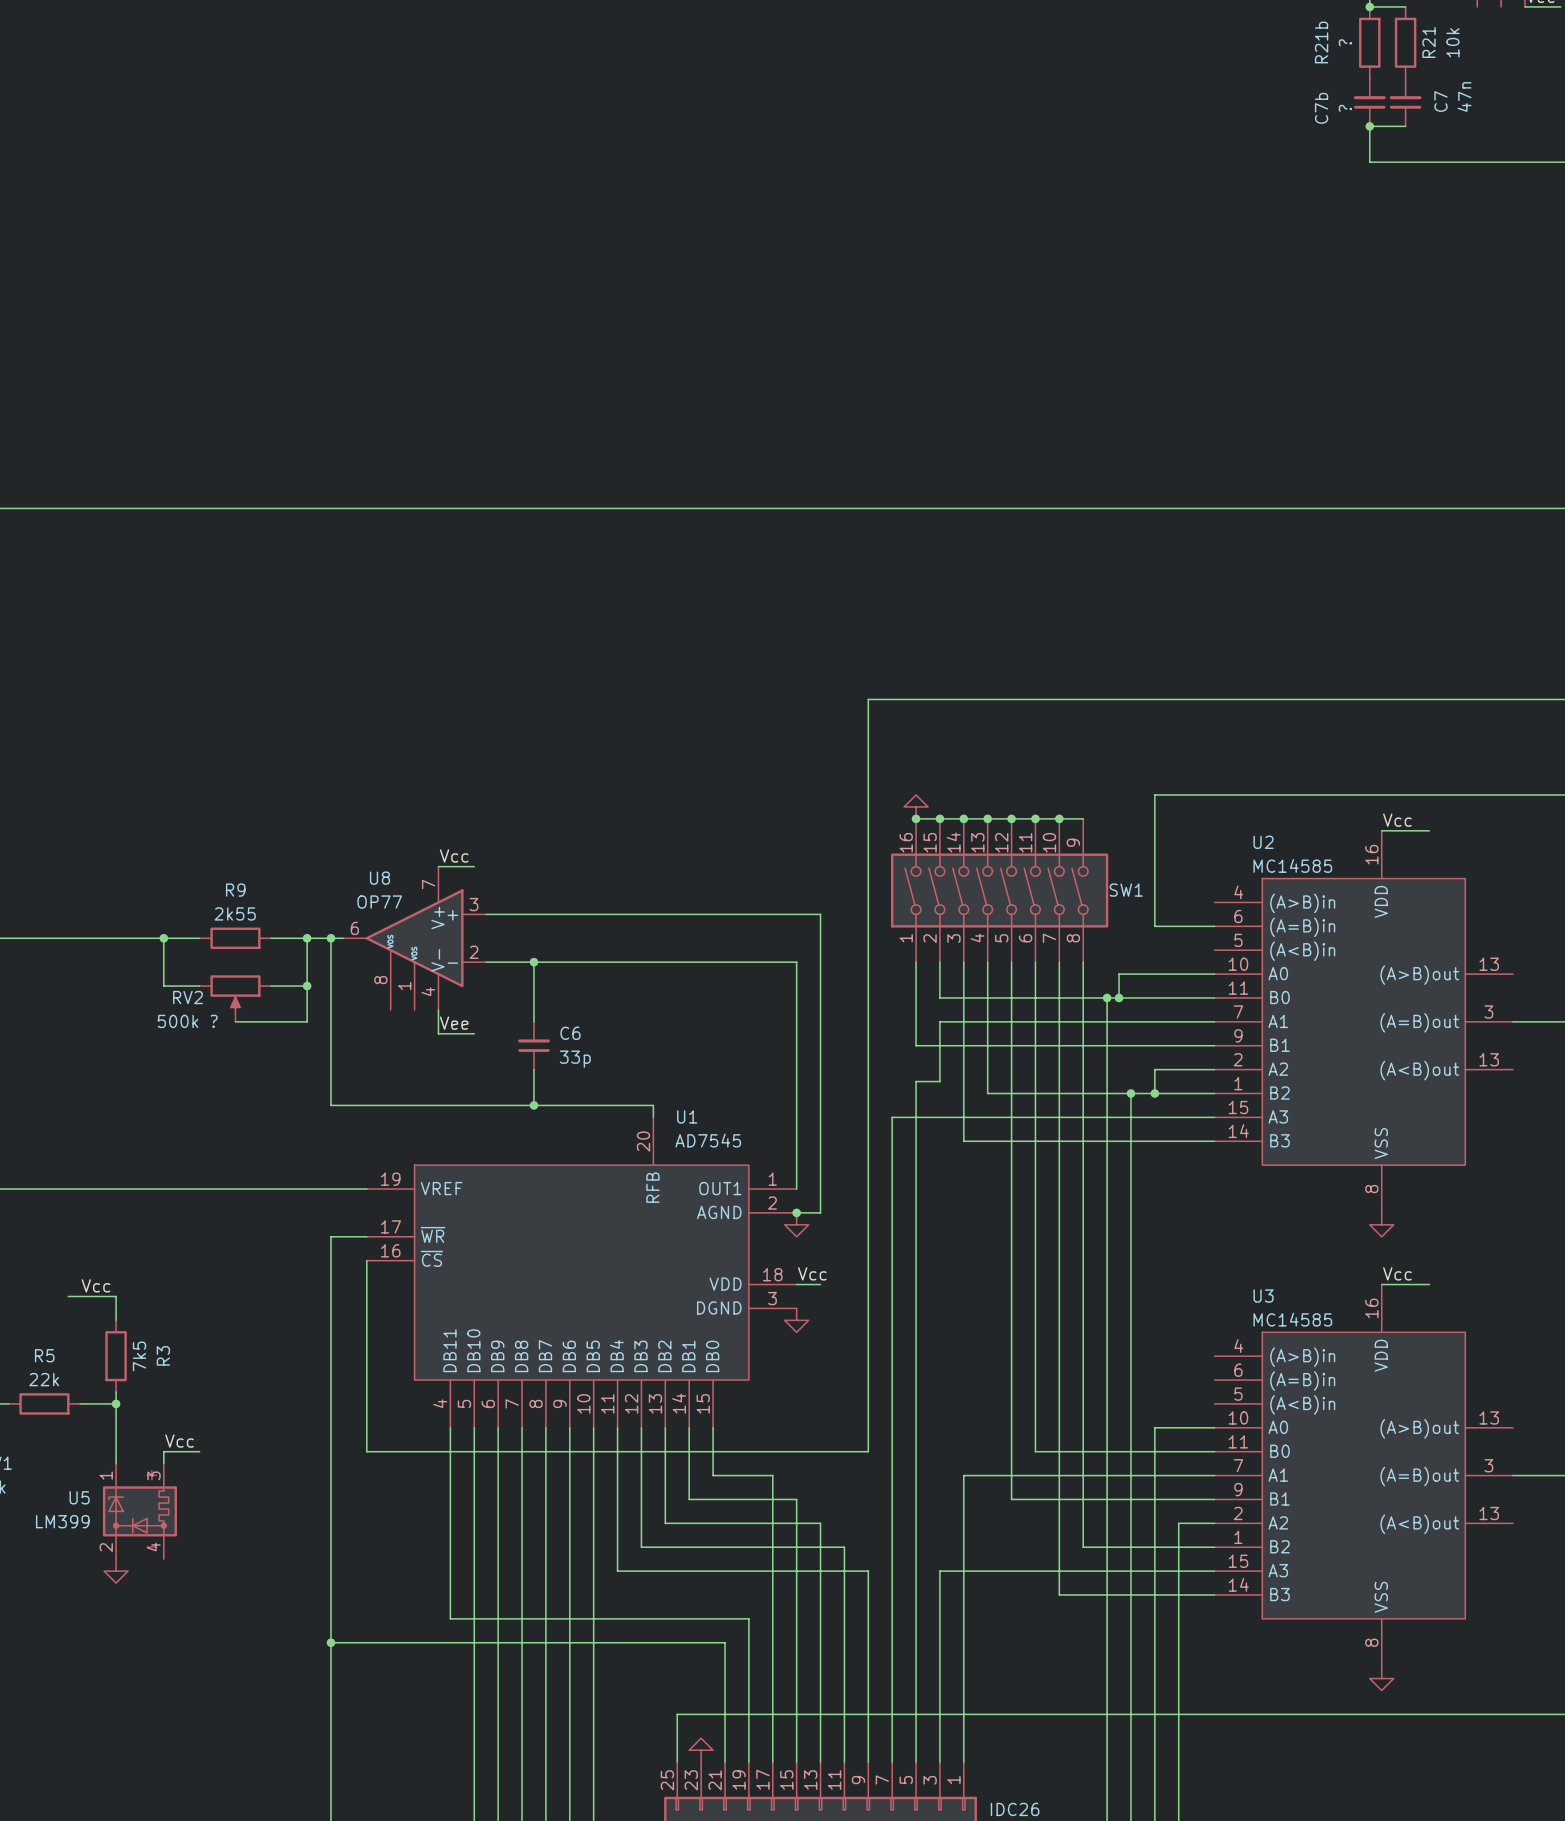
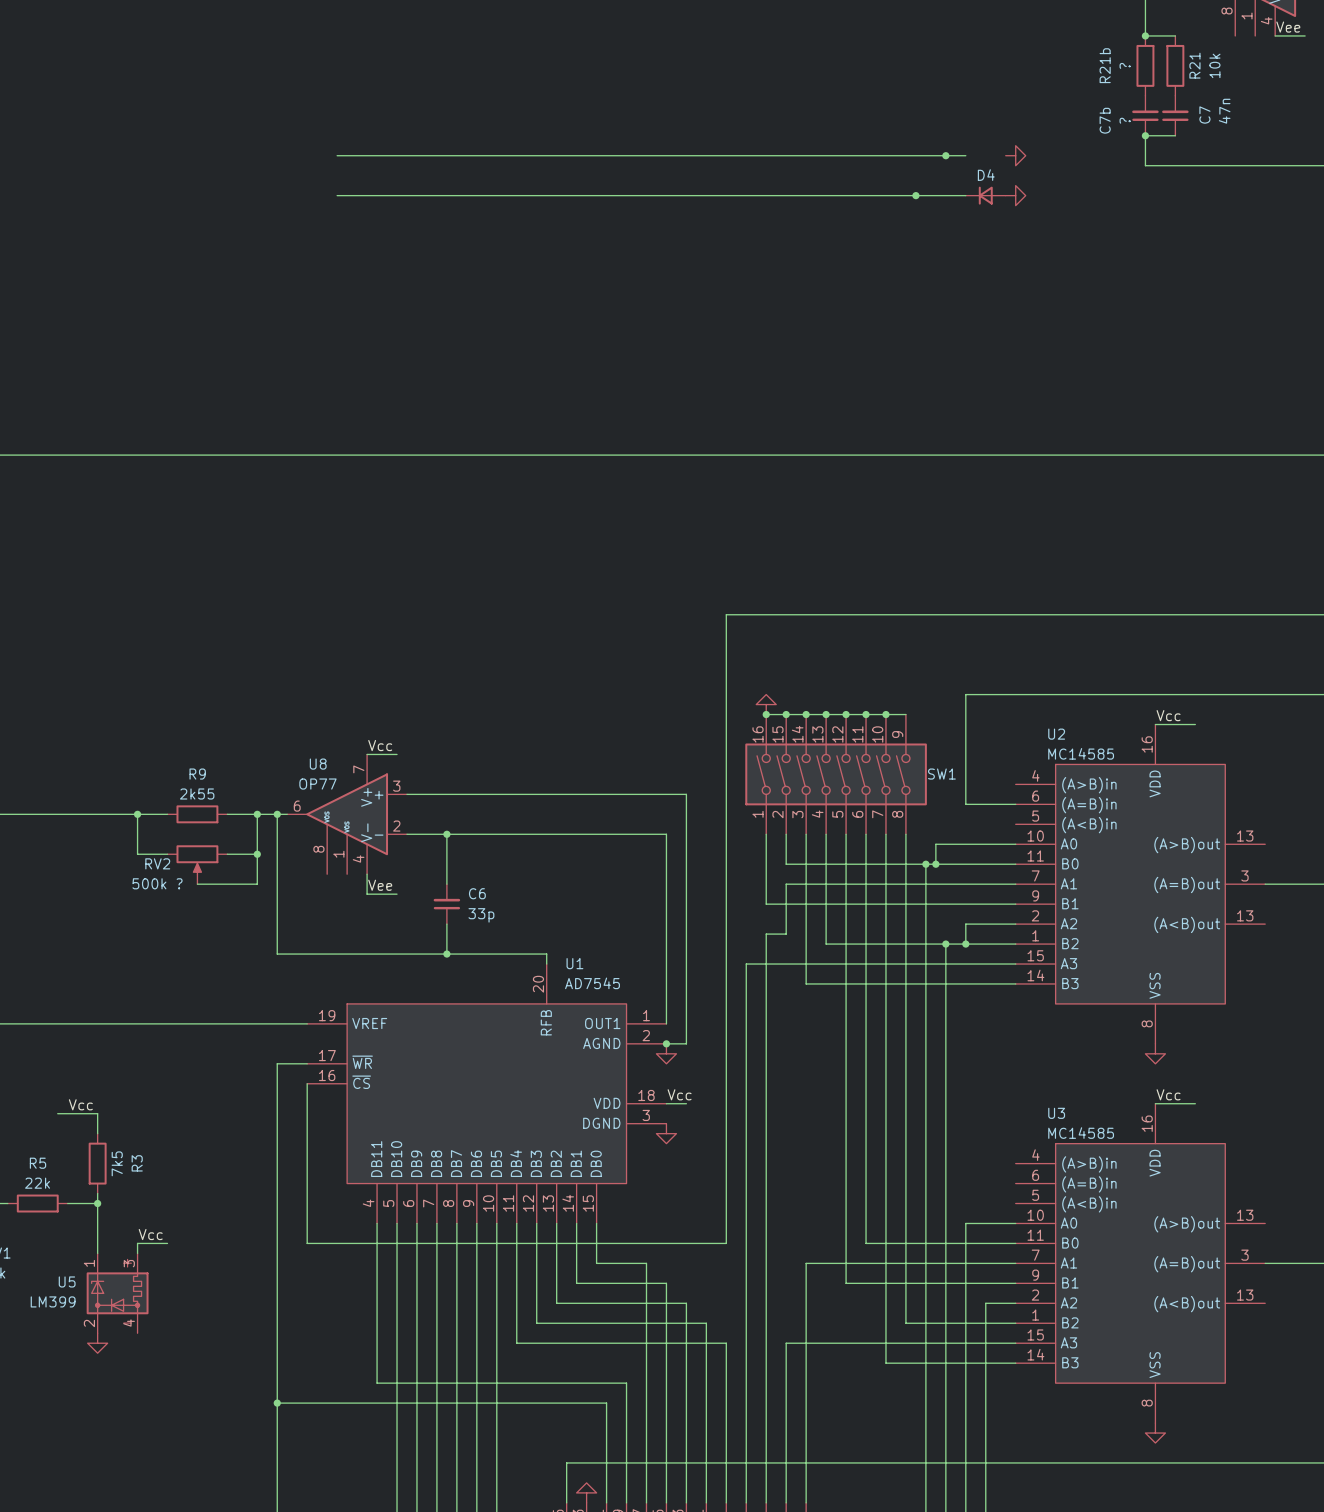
wire: none -> (337, 155) (965, 155)
junction: none -> (945, 155)
power symbol: none -> (1015, 155)
wire: none -> (337, 195) (965, 195)
junction: none -> (915, 195)
D4: none -> (985, 195)
power symbol: none -> (1015, 195)

